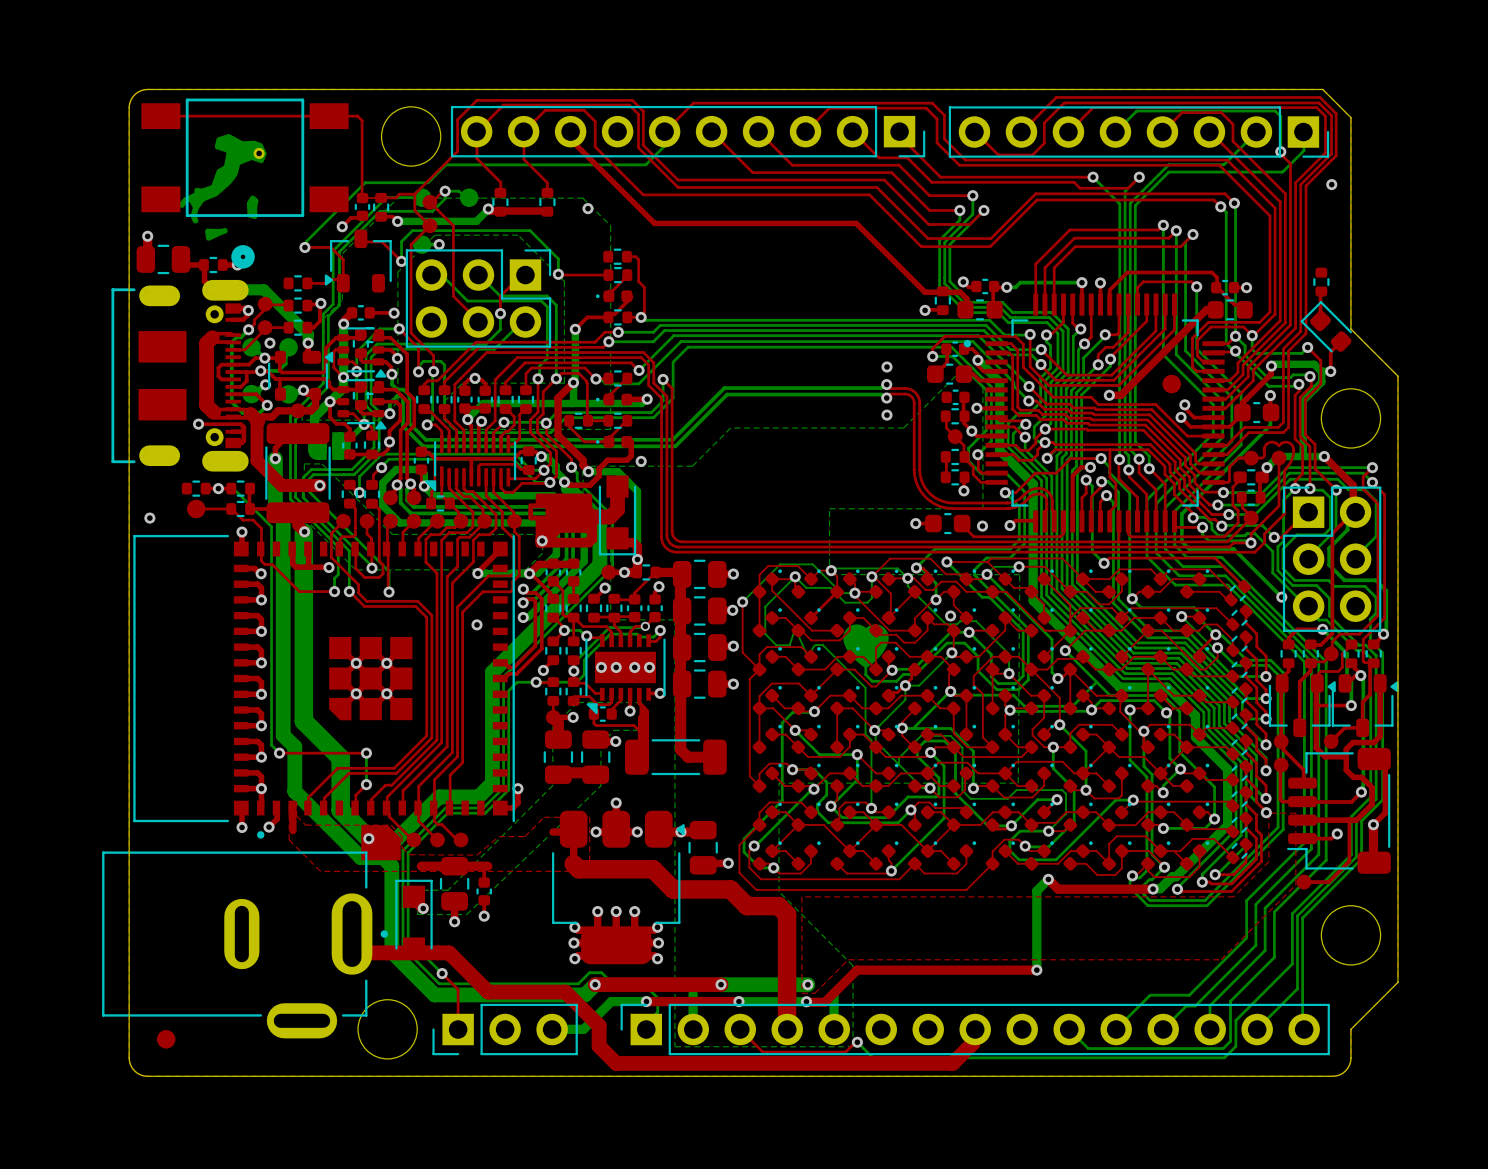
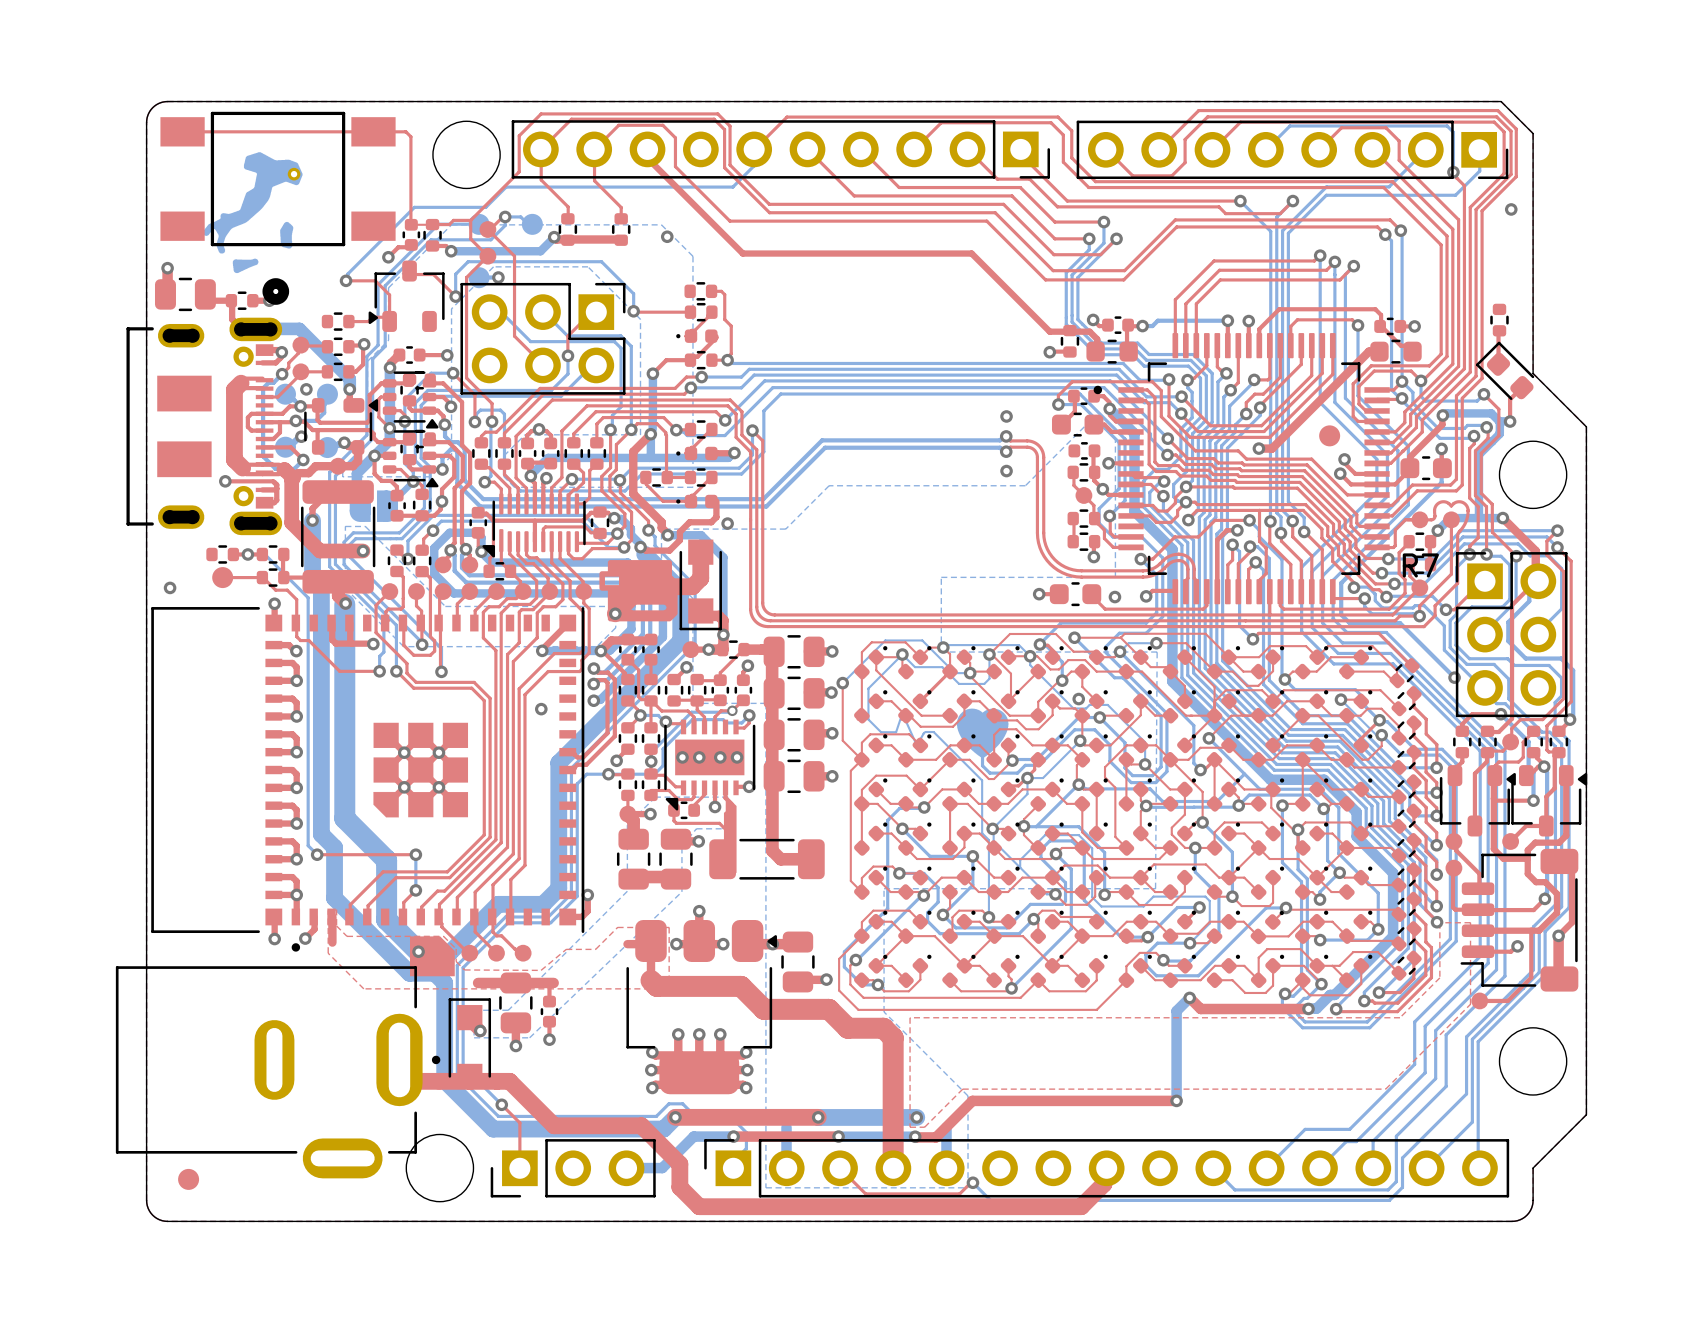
part: (1251, 477) -> none
R7: none -> (1419, 541)

